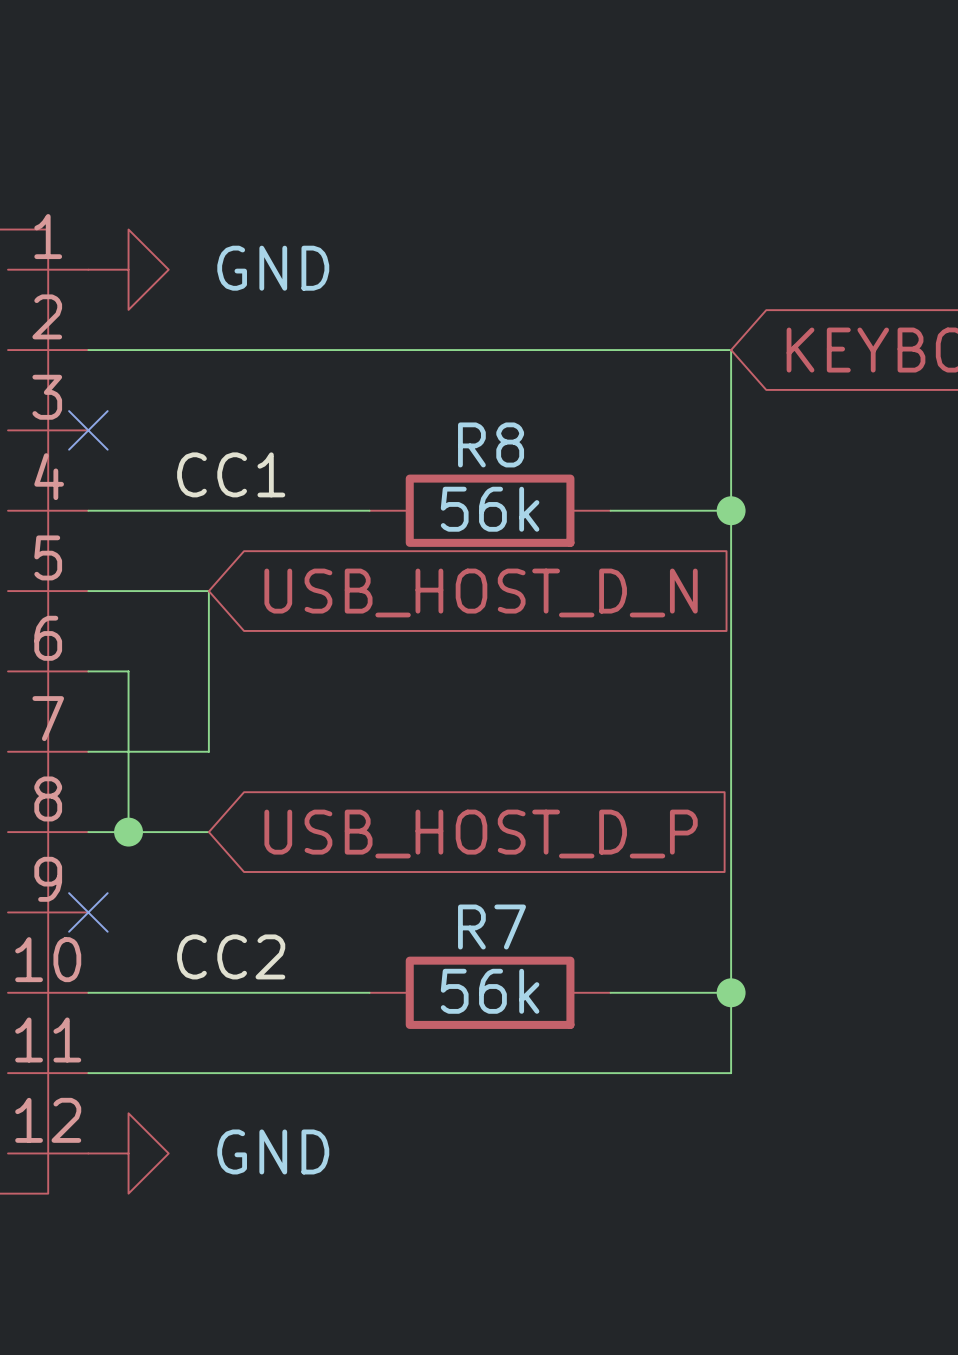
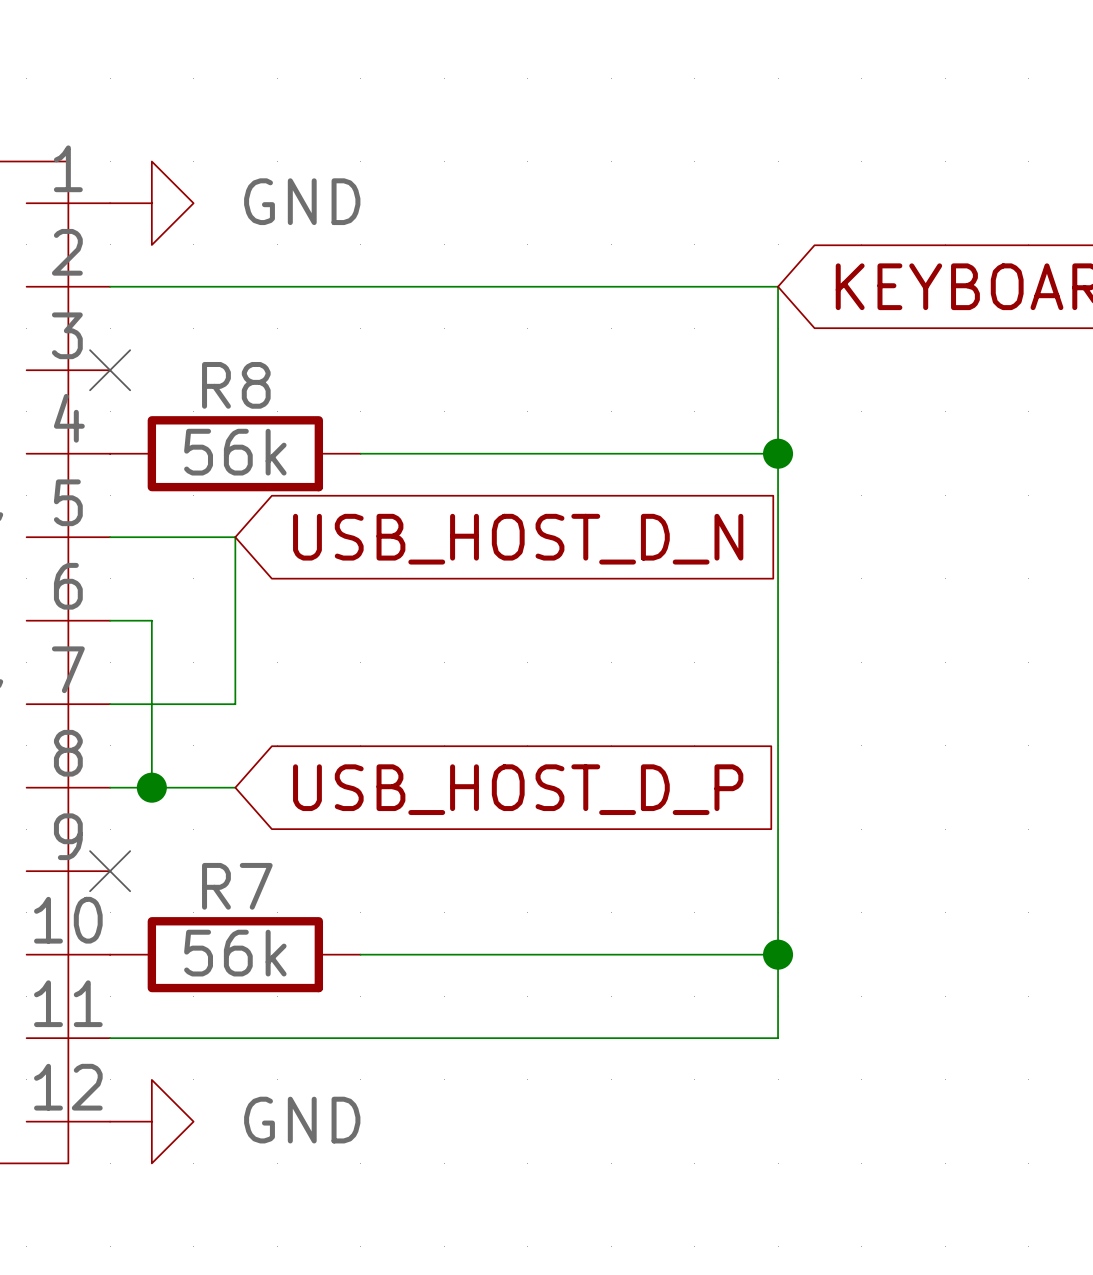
label: CC1 (231, 474) -> none
wire: (88, 510) (329, 510) -> (402, 453) (652, 453)
R8 position: (490, 510) -> (235, 453)
label: CC2 (231, 956) -> none
wire: (88, 992) (329, 992) -> (402, 954) (652, 954)
R7 position: (490, 992) -> (235, 954)

